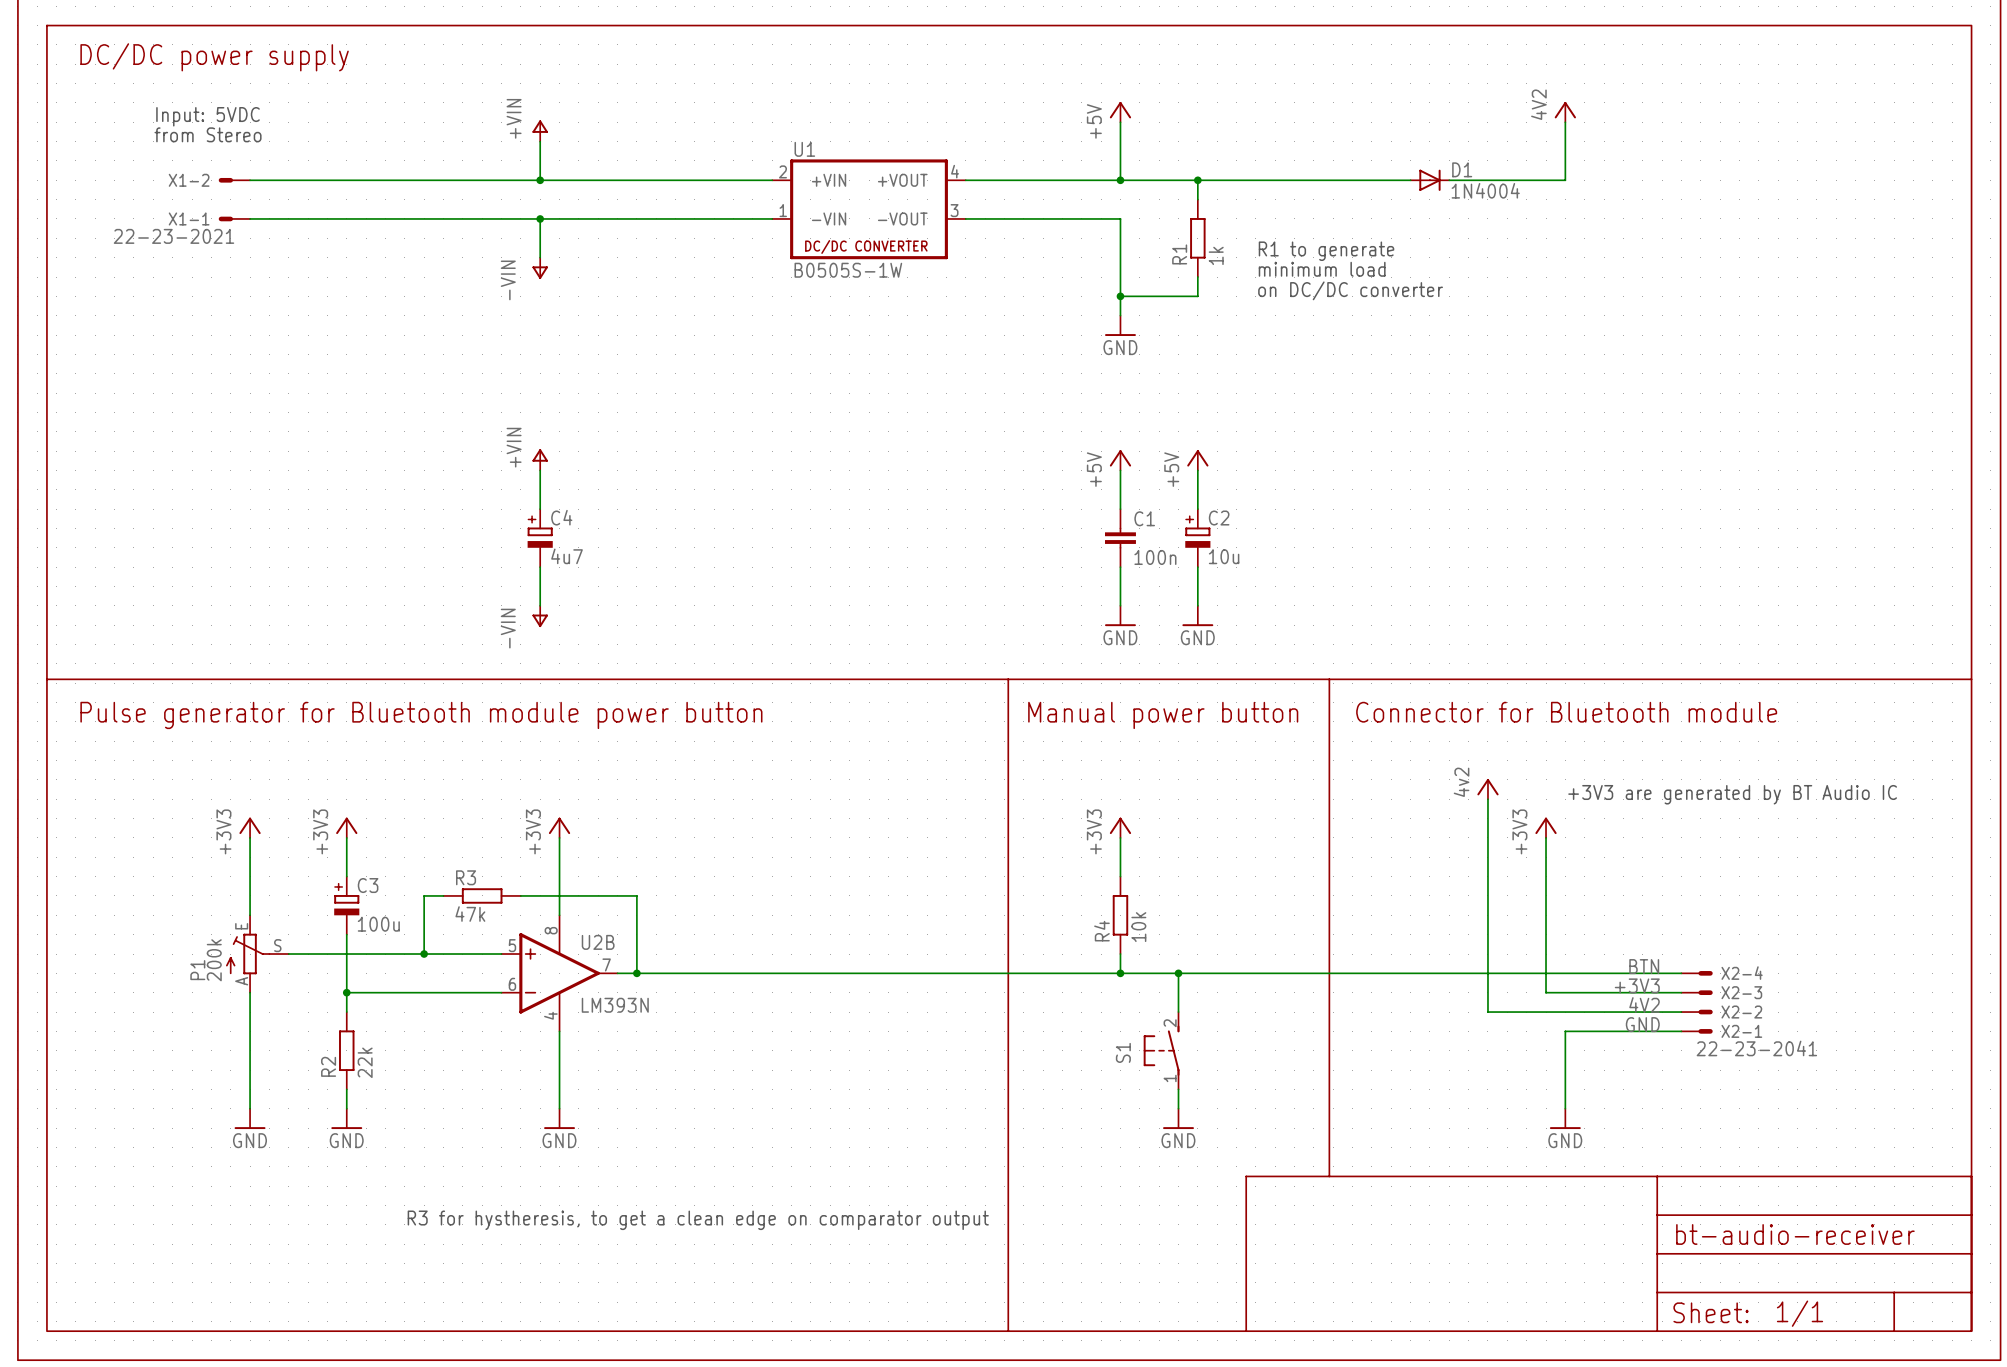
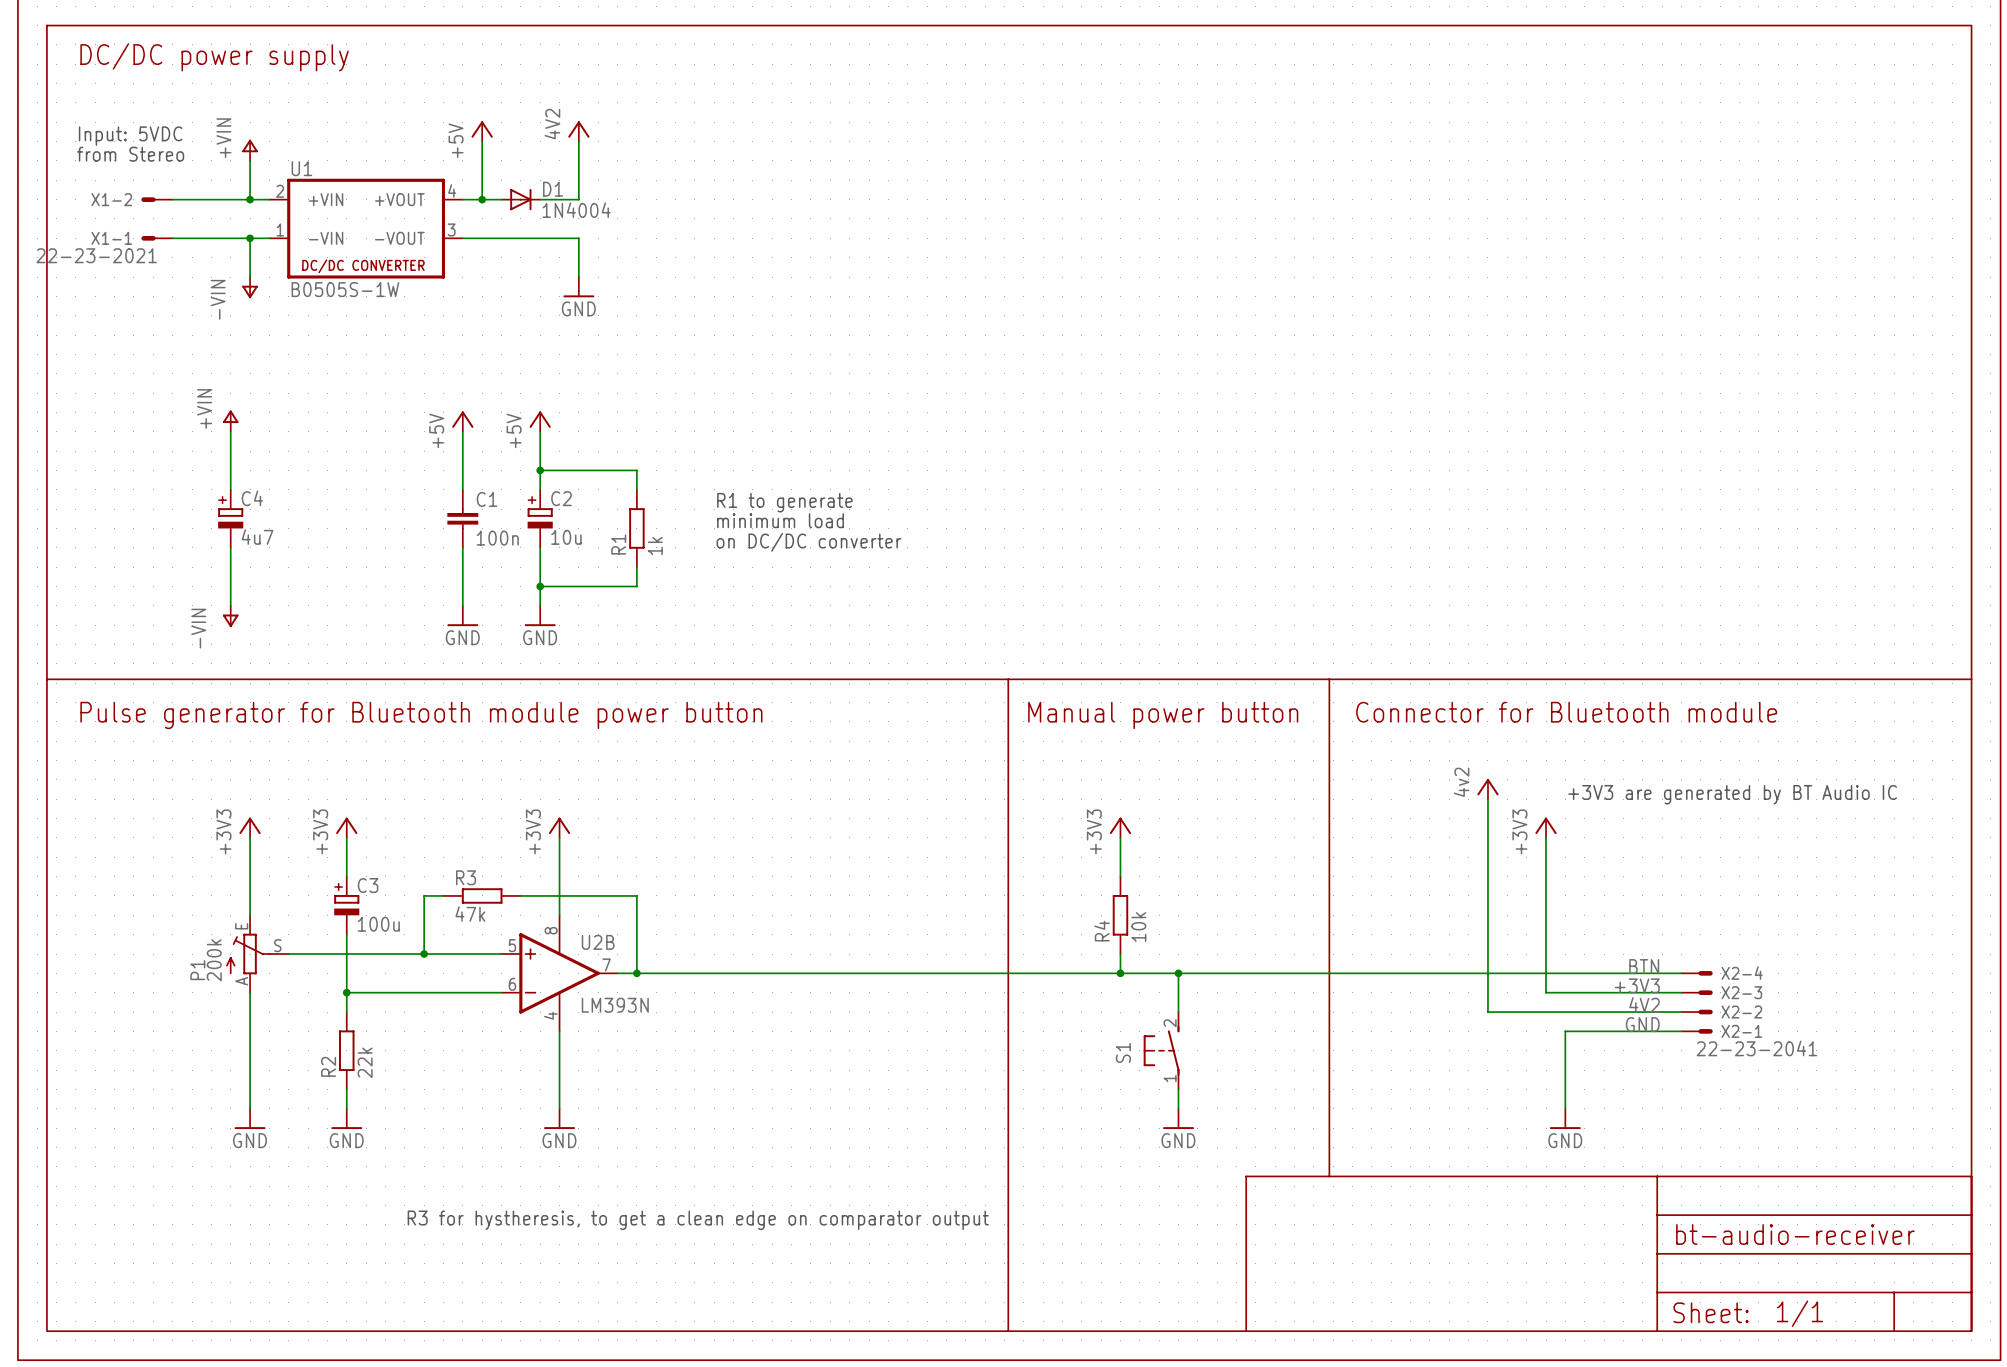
power symbol: +5V (1120, 112) -> none
power symbol: 4V2 (1565, 112) -> none
text position: Input: 5VDC (208, 116) -> Input: 5VDC (130, 136)
wire: (1120, 122) (1120, 180) -> none
wire: (1565, 122) (1565, 180) (1449, 180) -> none
power symbol: +VIN (540, 130) -> none
power symbol: none -> +5V (482, 131)
power symbol: none -> 4V2 (578, 131)
text position: from Stereo (208, 134) -> from Stereo (130, 154)
wire: none -> (482, 141) (482, 199)
wire: (540, 141) (540, 180) -> none
wire: none -> (578, 141) (578, 199) (540, 199)
power symbol: none -> +VIN (250, 150)
wire: none -> (250, 160) (250, 199)
X1-2 position: (234, 180) -> (157, 199)
wire: (250, 180) (772, 180) -> none
junction: (540, 180) -> none
wire: (965, 180) (1410, 180) -> none
junction: (1120, 180) -> none
wire: (1197, 180) (1197, 199) -> none
junction: (1197, 180) -> none
D1 position: (1429, 180) -> (520, 199)
wire: none -> (172, 199) (269, 199)
junction: none -> (250, 199)
wire: none -> (462, 199) (501, 199)
junction: none -> (482, 199)
U1 position: (869, 209) -> (366, 228)
X1-1 position: (234, 218) -> (157, 238)
wire: (250, 218) (772, 218) -> none
wire: (540, 218) (540, 257) -> none
junction: (540, 218) -> none
wire: (965, 218) (1120, 218) (1120, 315) -> none
wire: none -> (172, 238) (269, 238)
wire: none -> (250, 238) (250, 277)
junction: none -> (250, 238)
wire: none -> (462, 238) (578, 238) (578, 277)
R1 position: (1197, 238) -> (636, 528)
text: R1 to generate (1326, 251) -> none
power symbol: -VIN (540, 268) -> none
text: minimum load (1322, 269) -> none
wire: (1197, 277) (1197, 296) (1120, 296) -> none
power symbol: none -> -VIN (250, 287)
power symbol: none -> GND (578, 287)
text: on DC/DC converter (1350, 290) -> none
junction: (1120, 296) -> none
power symbol: GND (1120, 325) -> none
power symbol: none -> +VIN (230, 421)
power symbol: none -> +5V (462, 421)
power symbol: none -> +5V (540, 421)
wire: none -> (230, 431) (230, 489)
wire: none -> (462, 431) (462, 489)
wire: none -> (540, 431) (540, 470) (636, 470) (636, 489)
power symbol: +VIN (540, 459) -> none
power symbol: +5V (1120, 460) -> none
power symbol: +5V (1197, 460) -> none
junction: none -> (540, 470)
wire: (1120, 470) (1120, 509) -> none
wire: (1197, 470) (1197, 509) -> none
text: none -> R1 to generate (784, 502)
text: none -> minimum load (780, 520)
C4 position: (540, 538) -> (230, 518)
C1 position: (1120, 538) -> (462, 518)
C2 position: (1197, 538) -> (540, 518)
text: none -> on DC/DC converter (808, 542)
wire: none -> (230, 547) (230, 605)
wire: none -> (462, 547) (462, 605)
wire: none -> (636, 567) (636, 586) (540, 586)
wire: (1120, 567) (1120, 605) -> none
wire: (1197, 567) (1197, 605) -> none
junction: none -> (540, 586)
power symbol: none -> GND (462, 615)
power symbol: GND (1120, 615) -> none
power symbol: GND (1197, 615) -> none
power symbol: none -> -VIN (230, 616)
power symbol: -VIN (540, 616) -> GND (540, 615)

